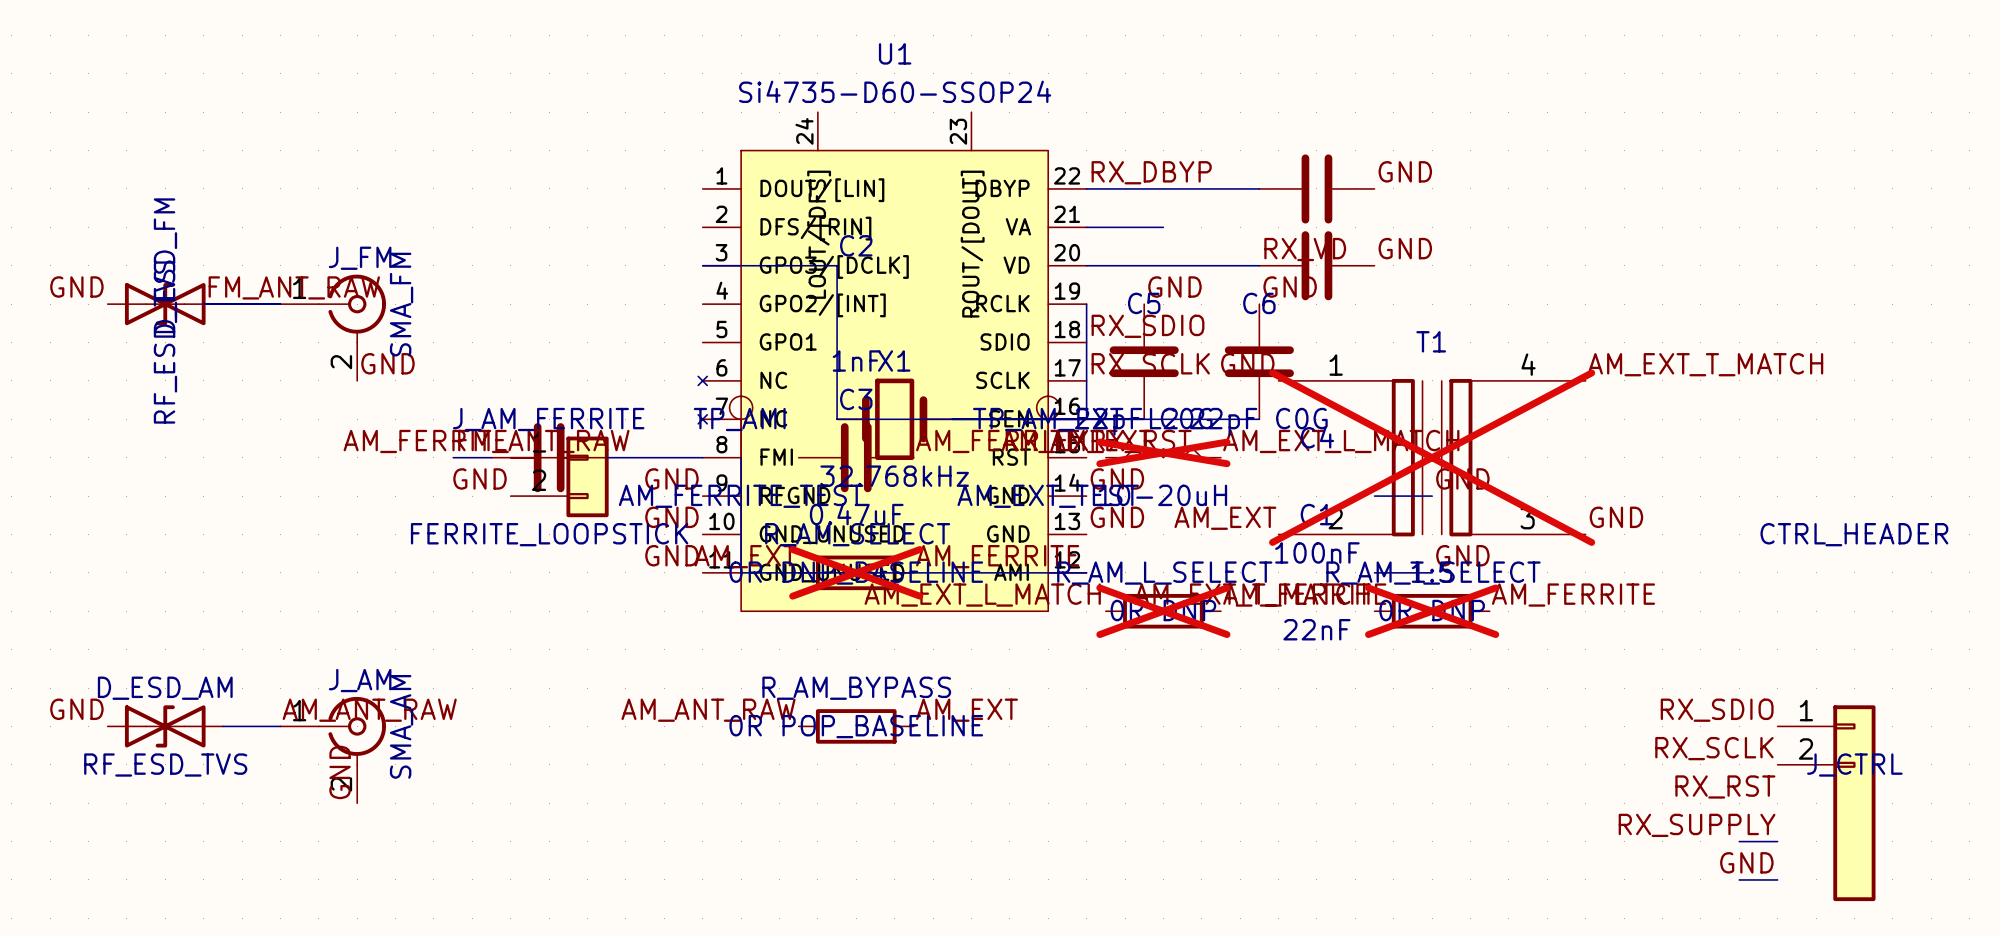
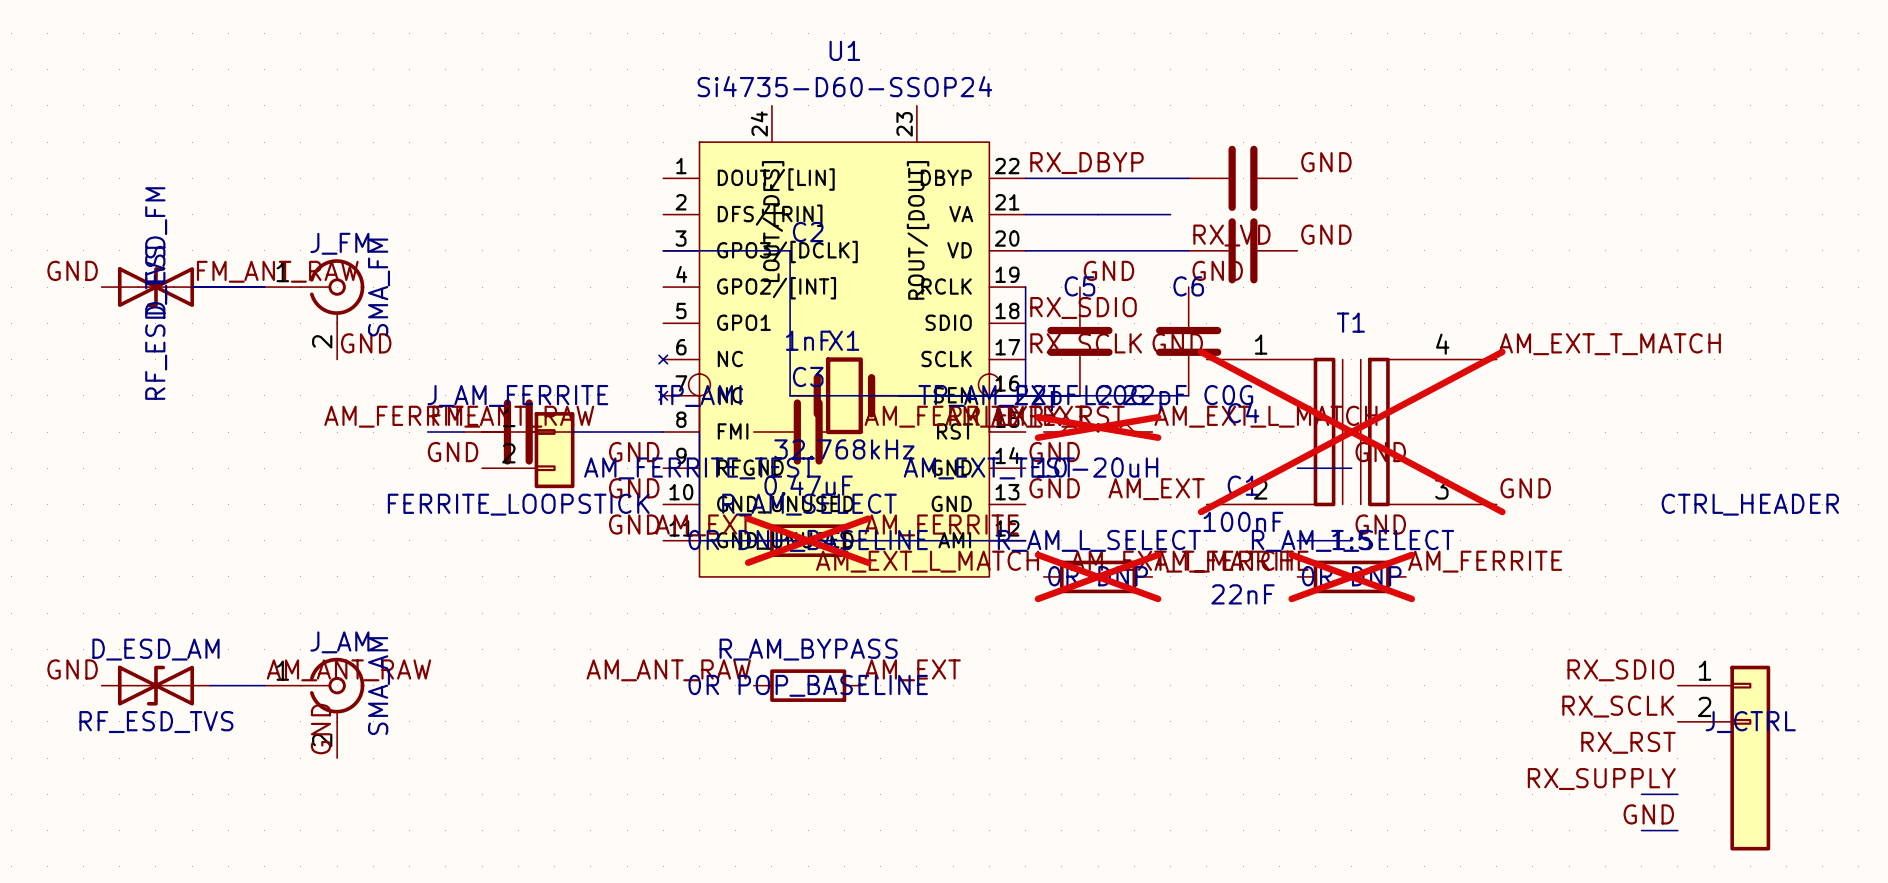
wire: none -> (1098, 214) (1170, 214)

